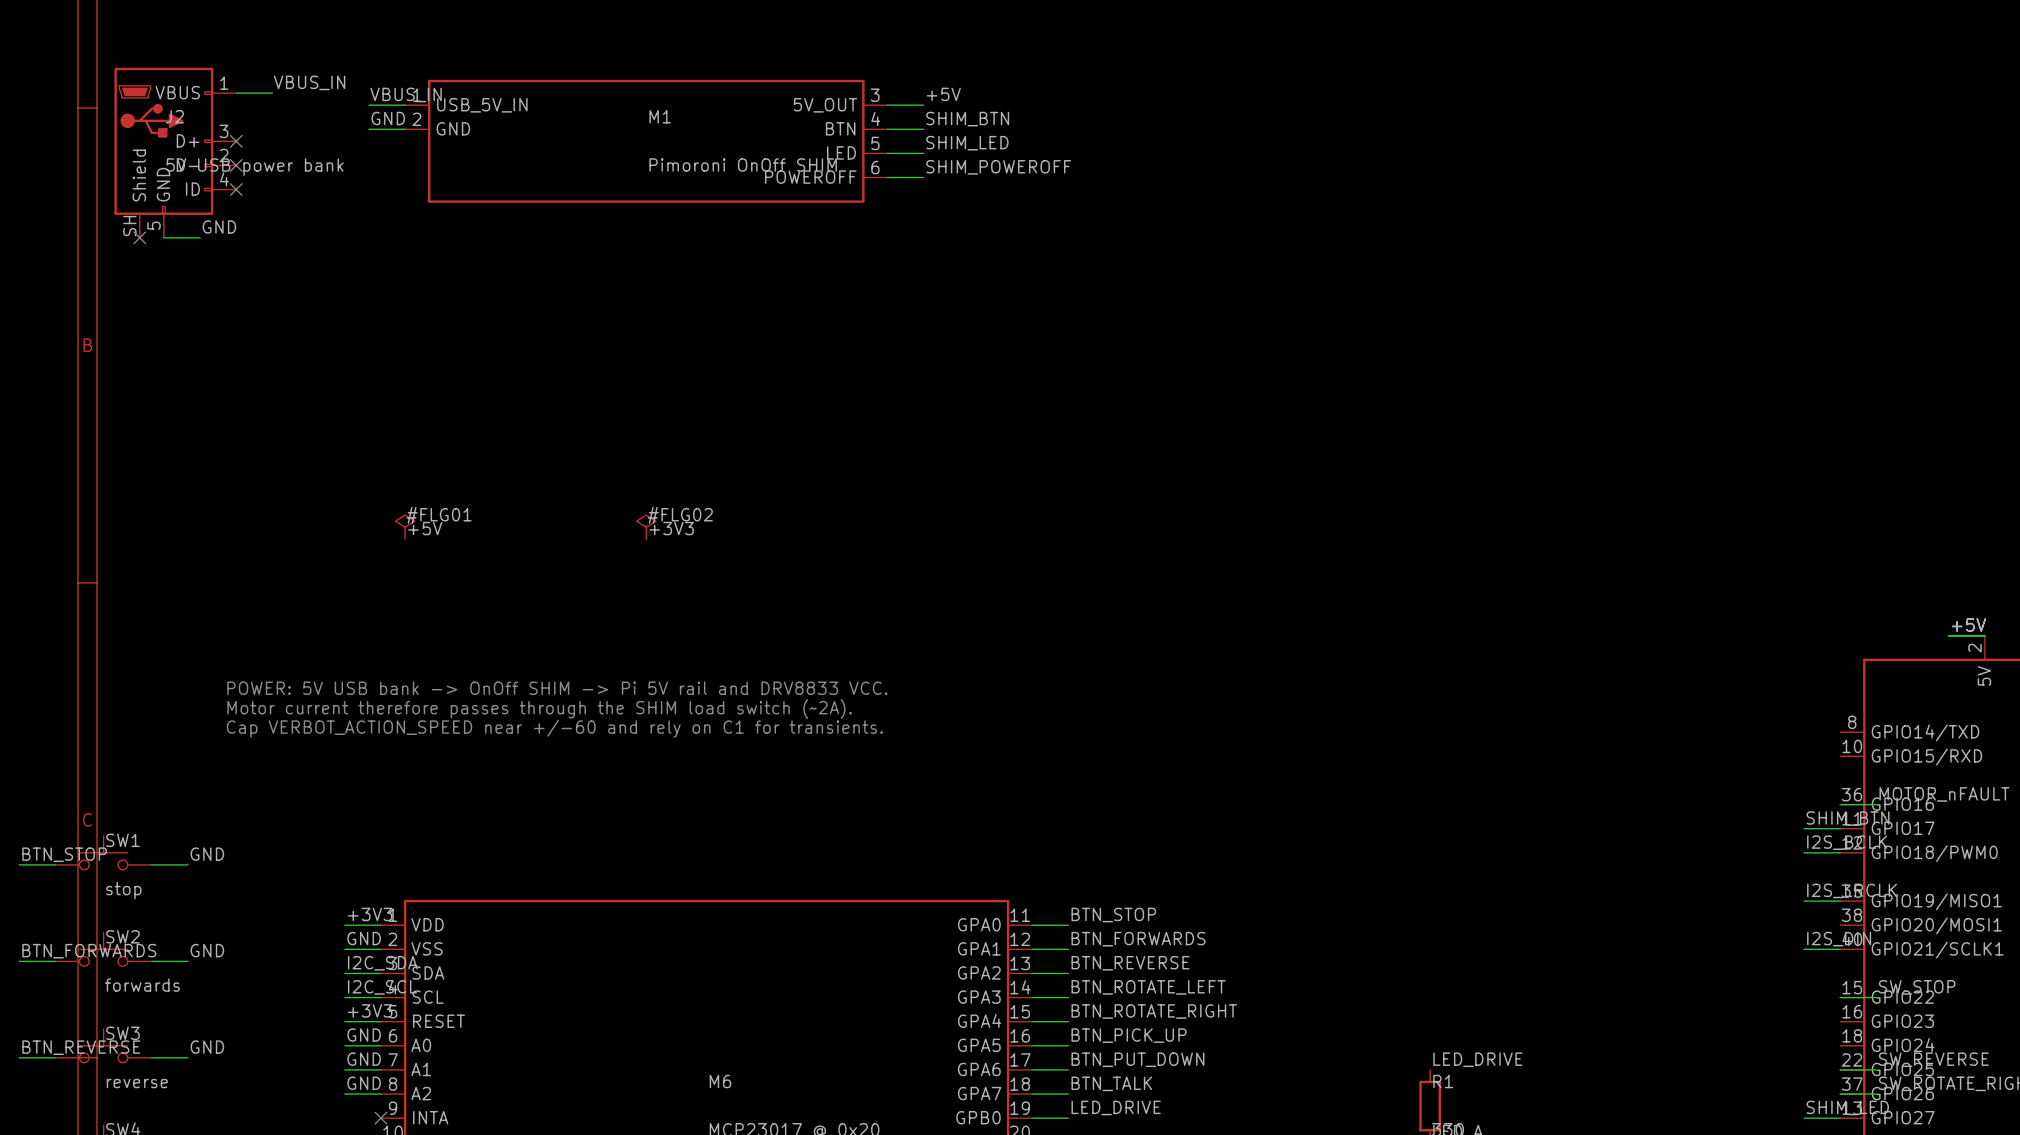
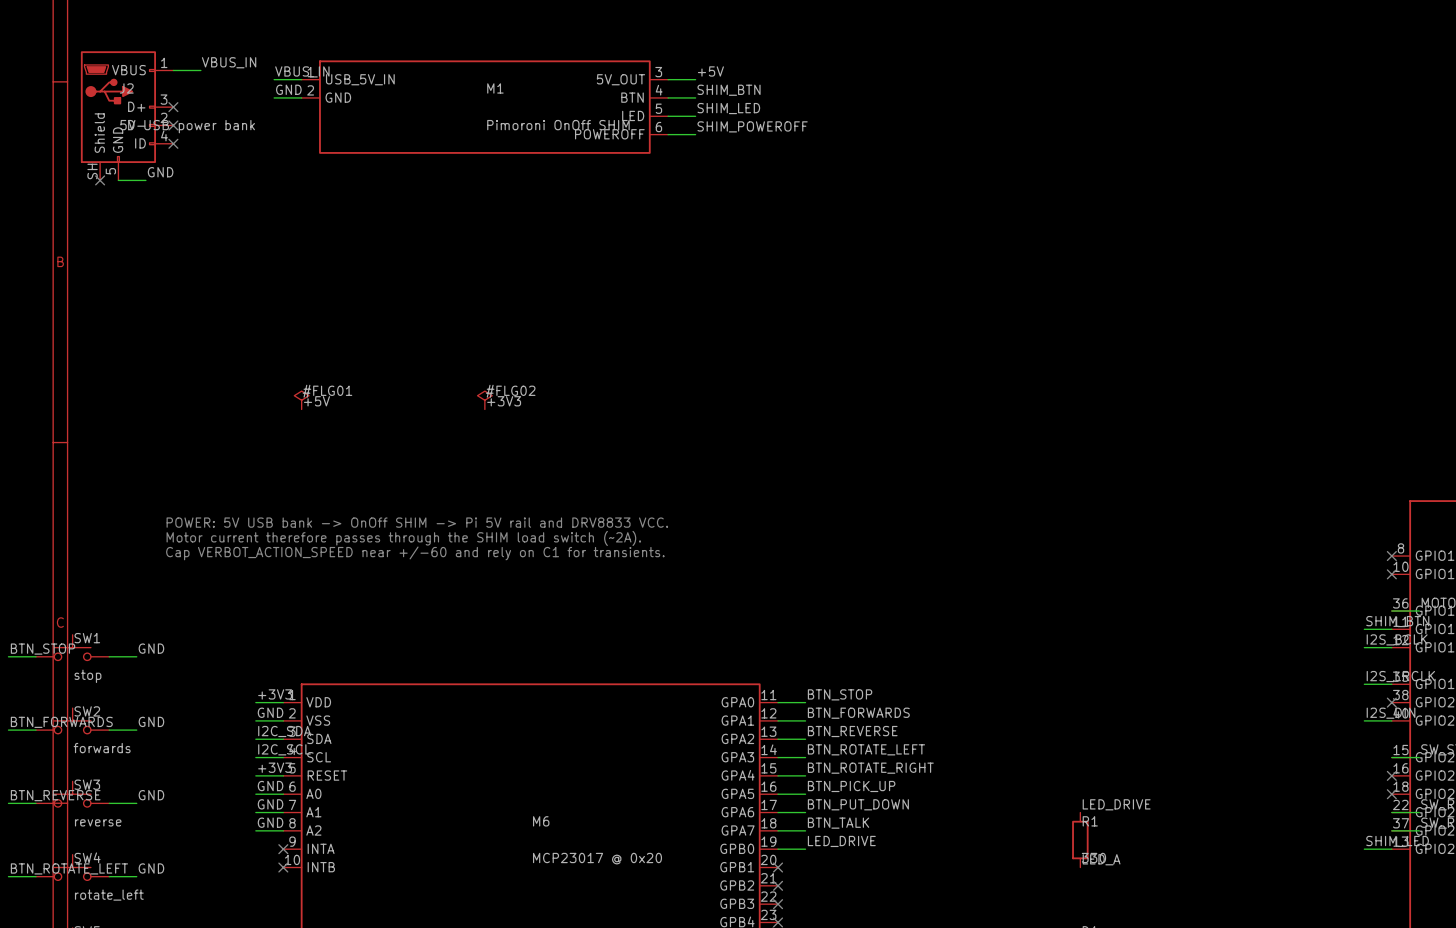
no-connect mark: none -> (1391, 556)
no-connect mark: none -> (1391, 574)
no-connect mark: none -> (1391, 702)
no-connect mark: none -> (1391, 775)
no-connect mark: none -> (1391, 794)

